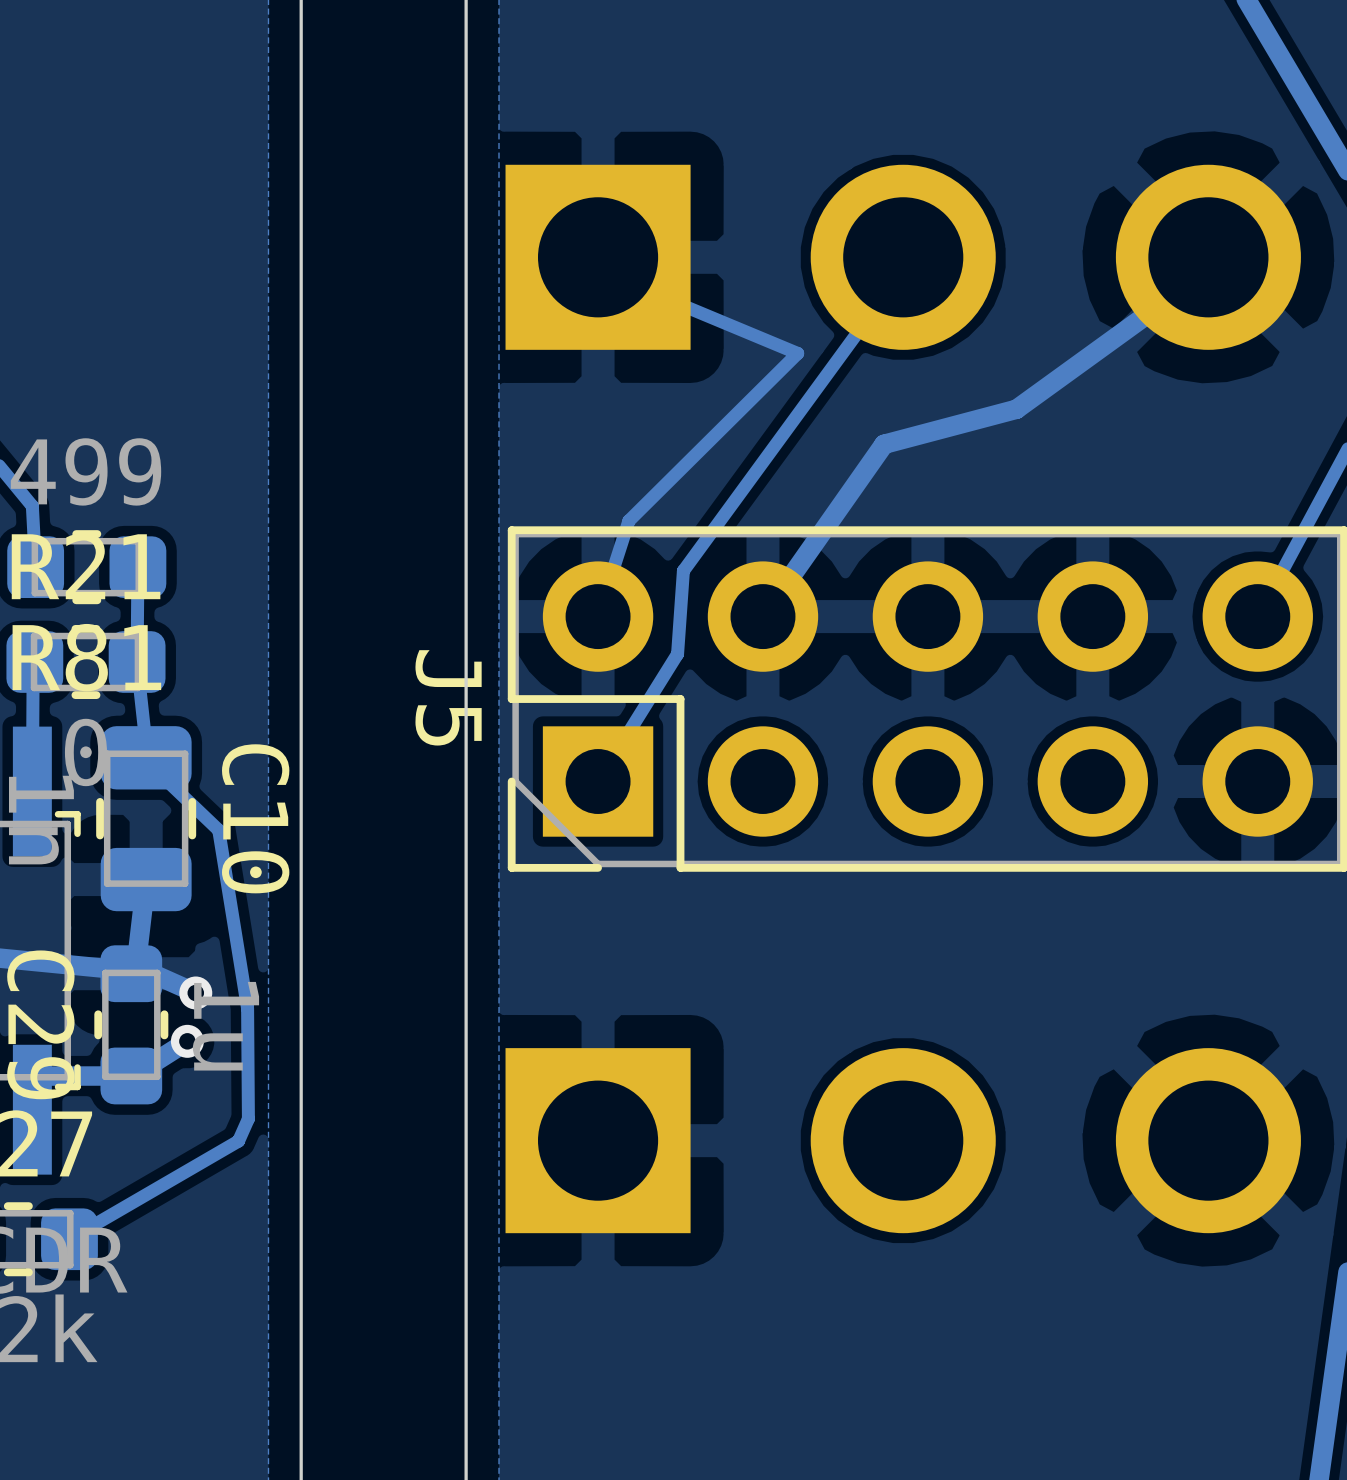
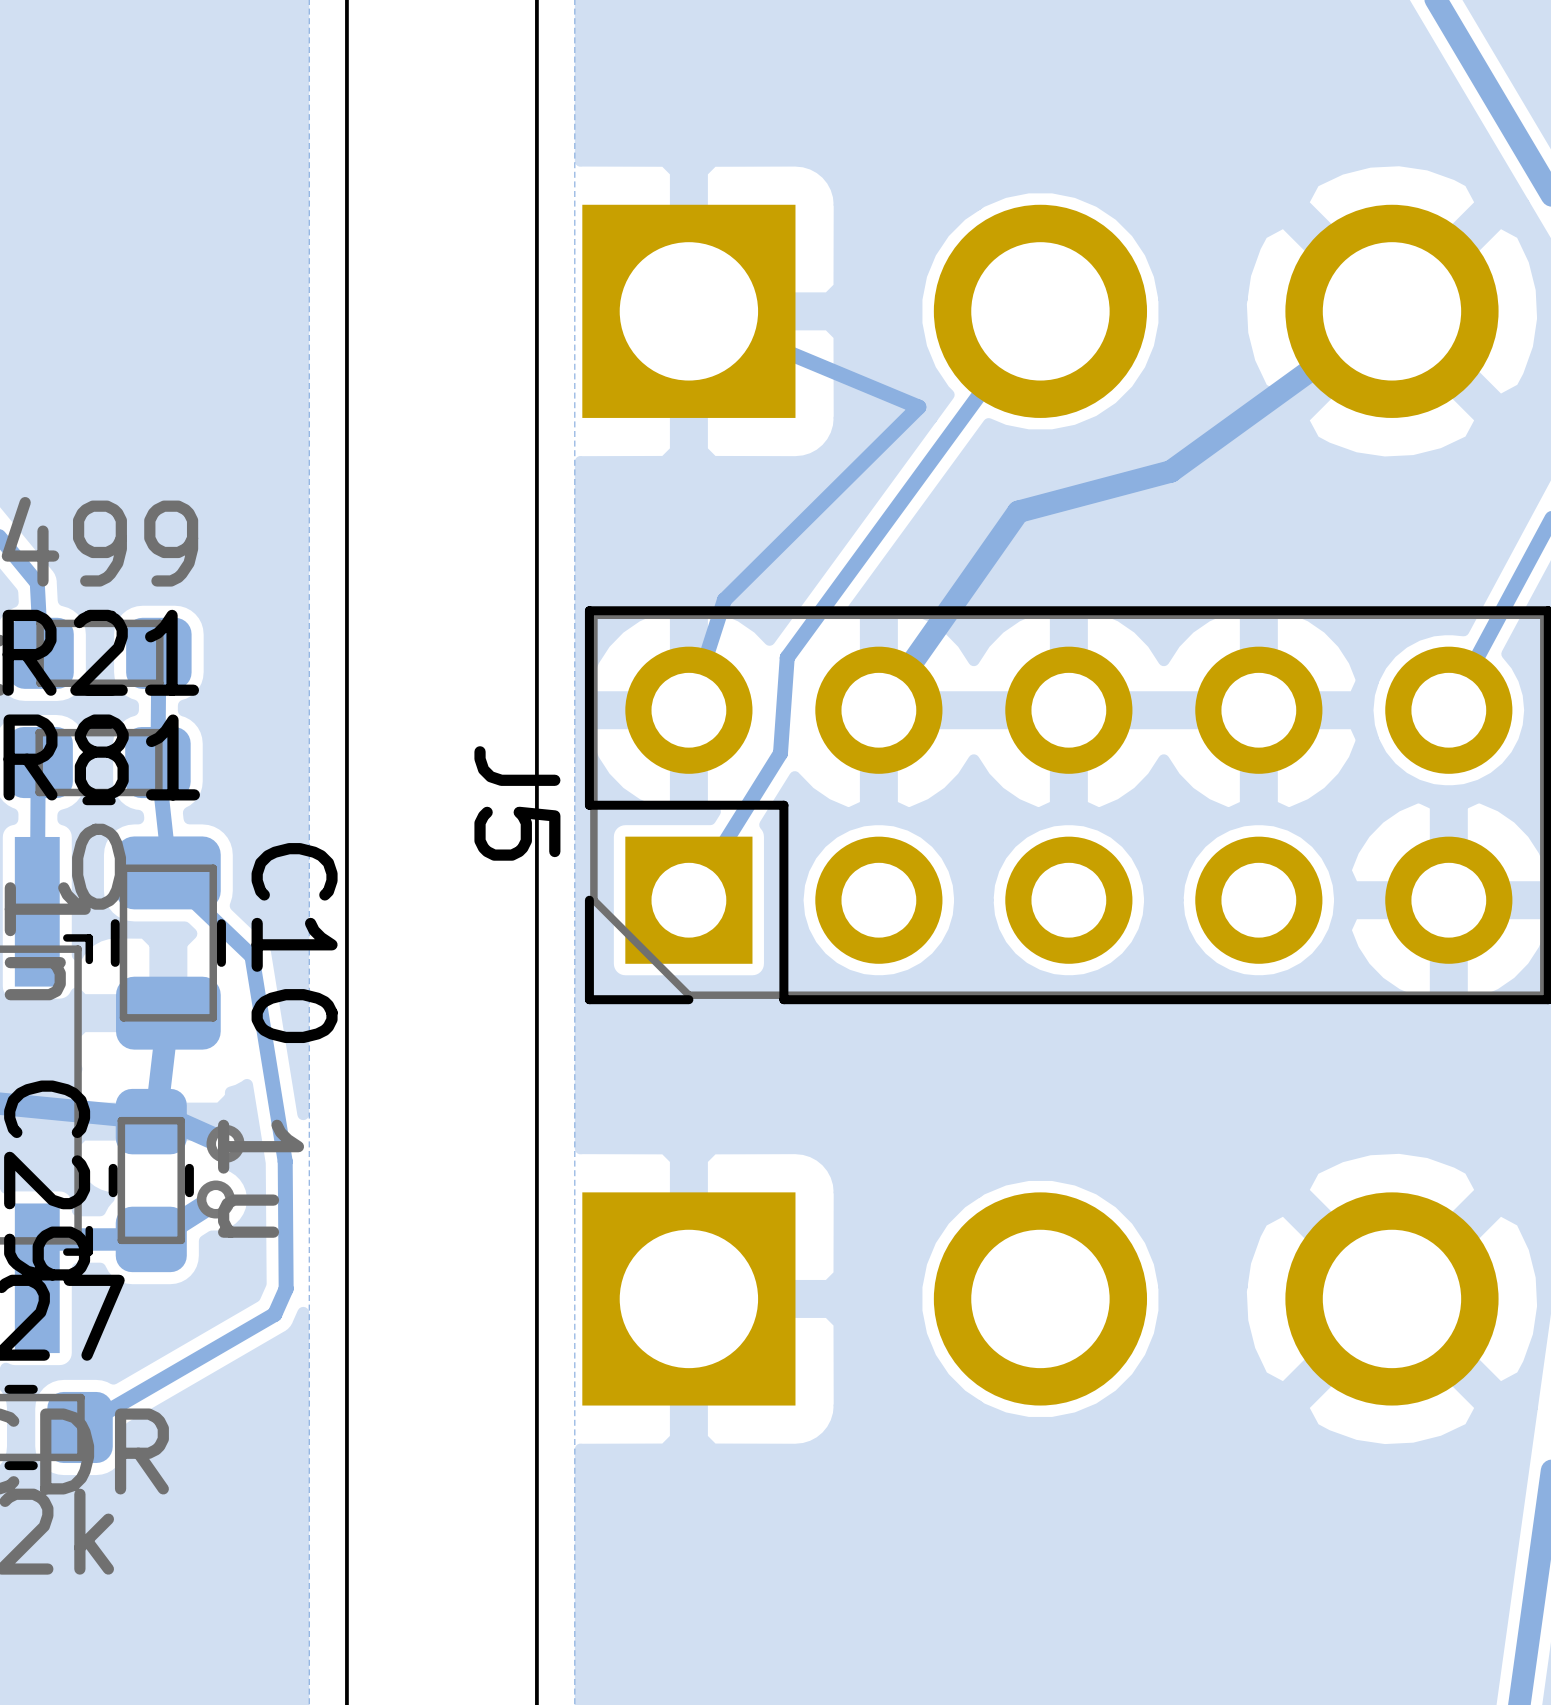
part position: (903, 257) -> (1040, 311)
part position: (903, 1140) -> (1040, 1298)

